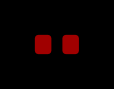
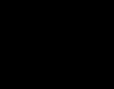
part: (56, 44) -> none

